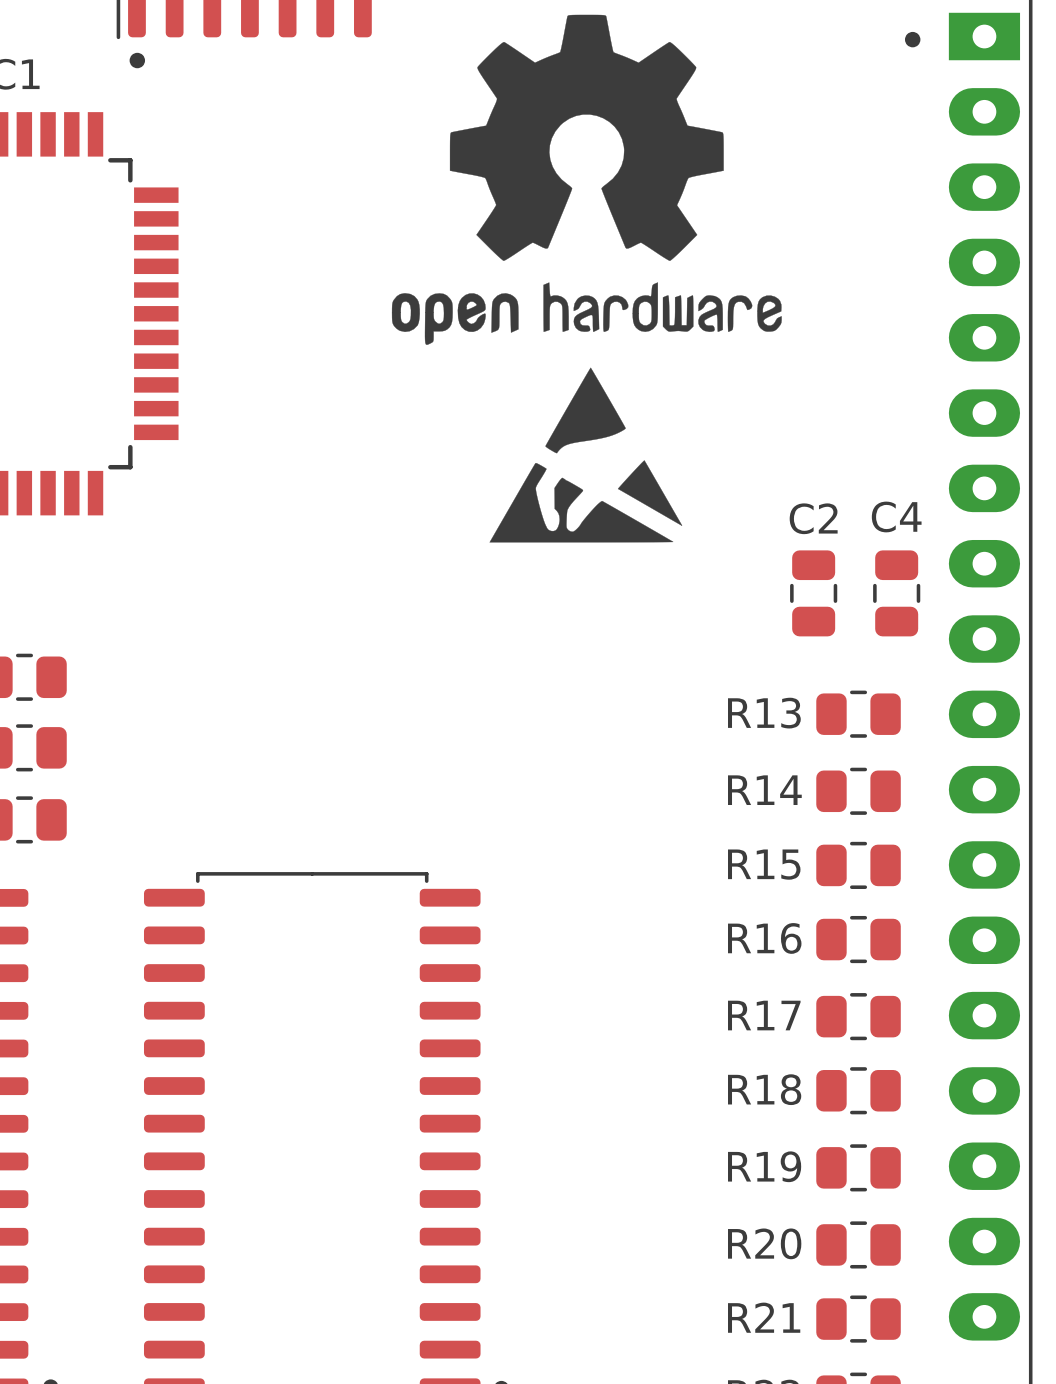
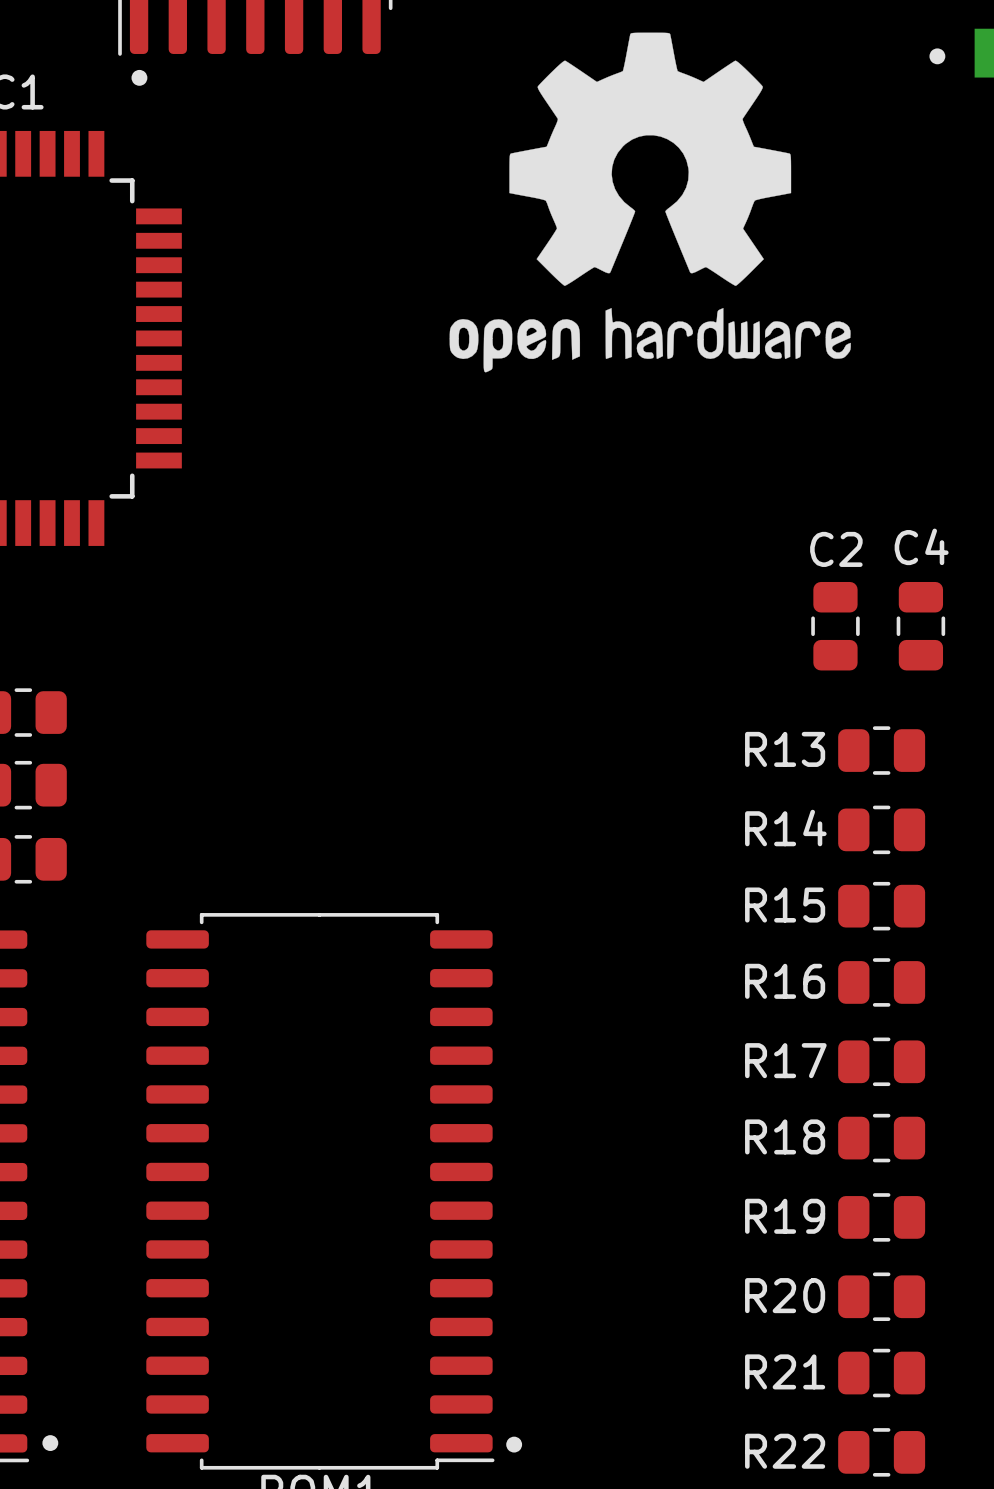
drawing position: (586, 179) -> (650, 202)
drawing: [489, 367, 683, 543] -> none

